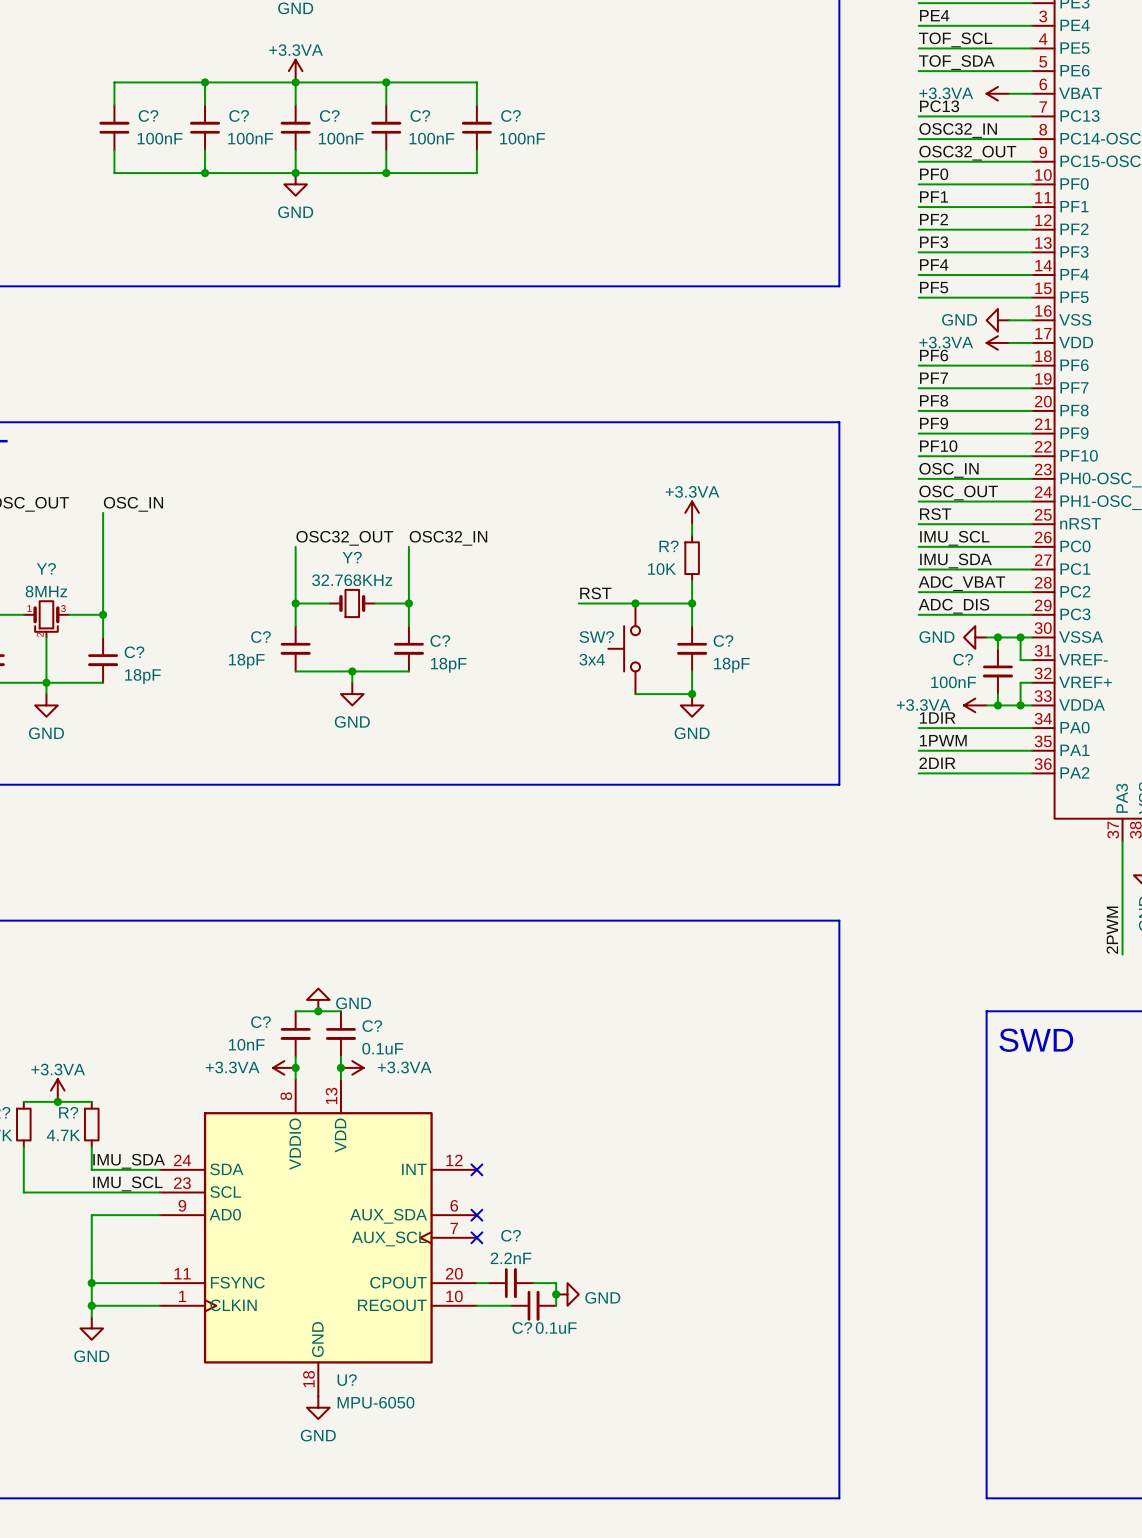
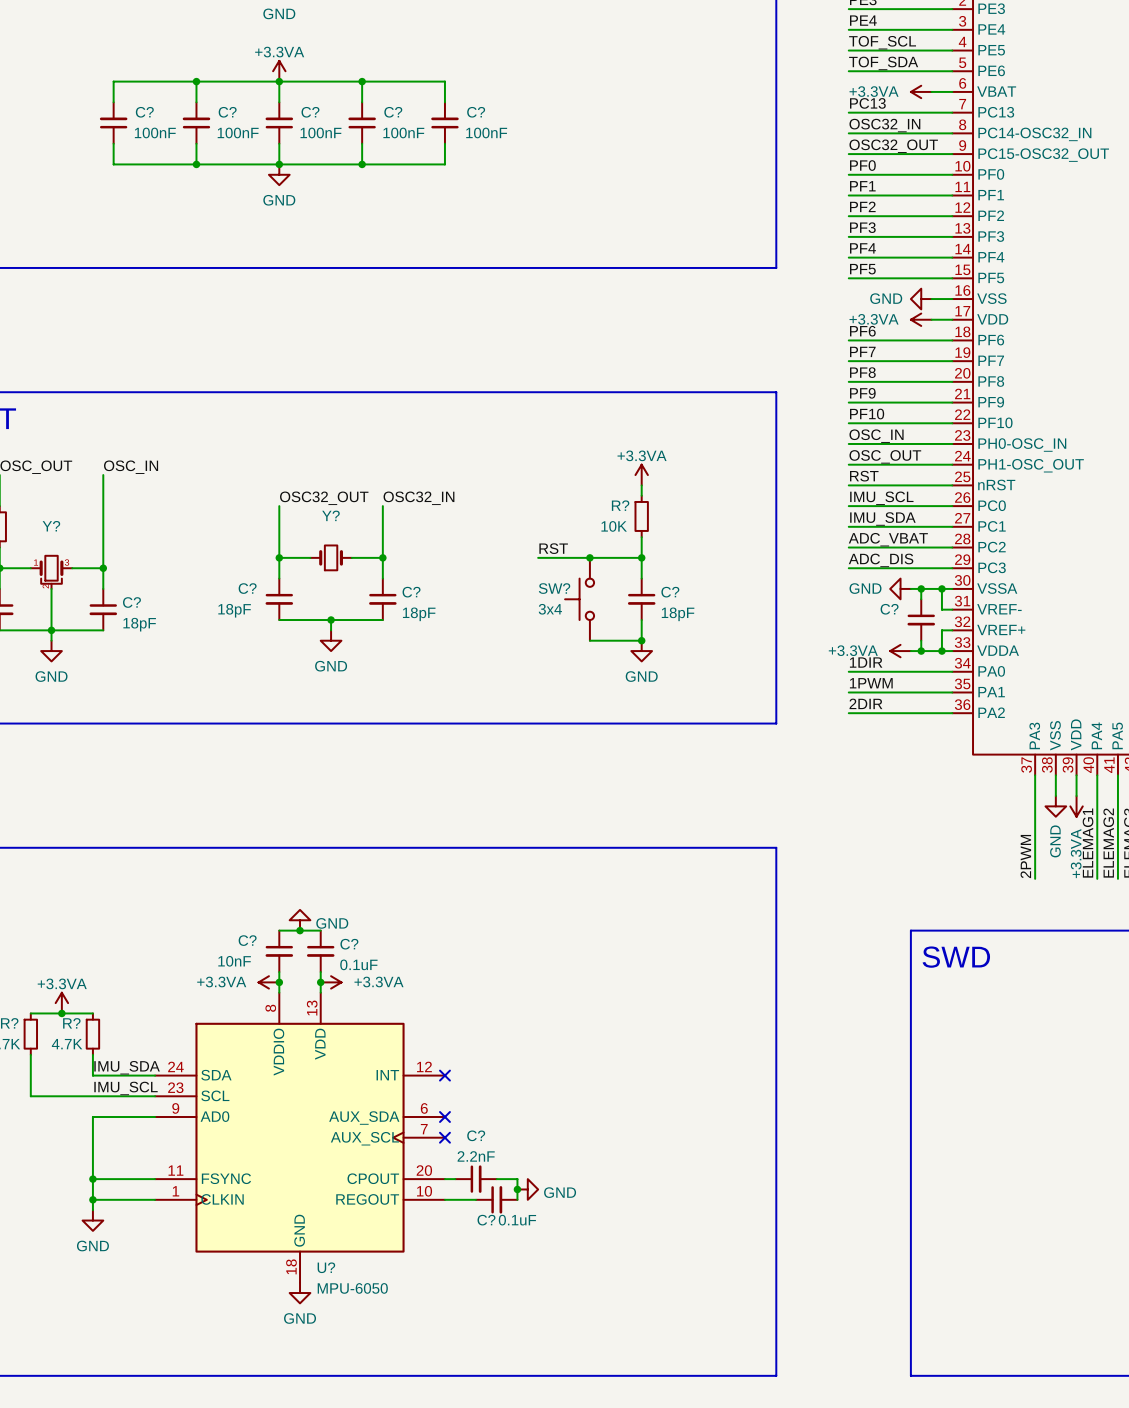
Y? value: 32.768KHz (352, 580) -> none
Y? value: 8MHz (46, 591) -> none
C? value: 100nF (953, 682) -> none

